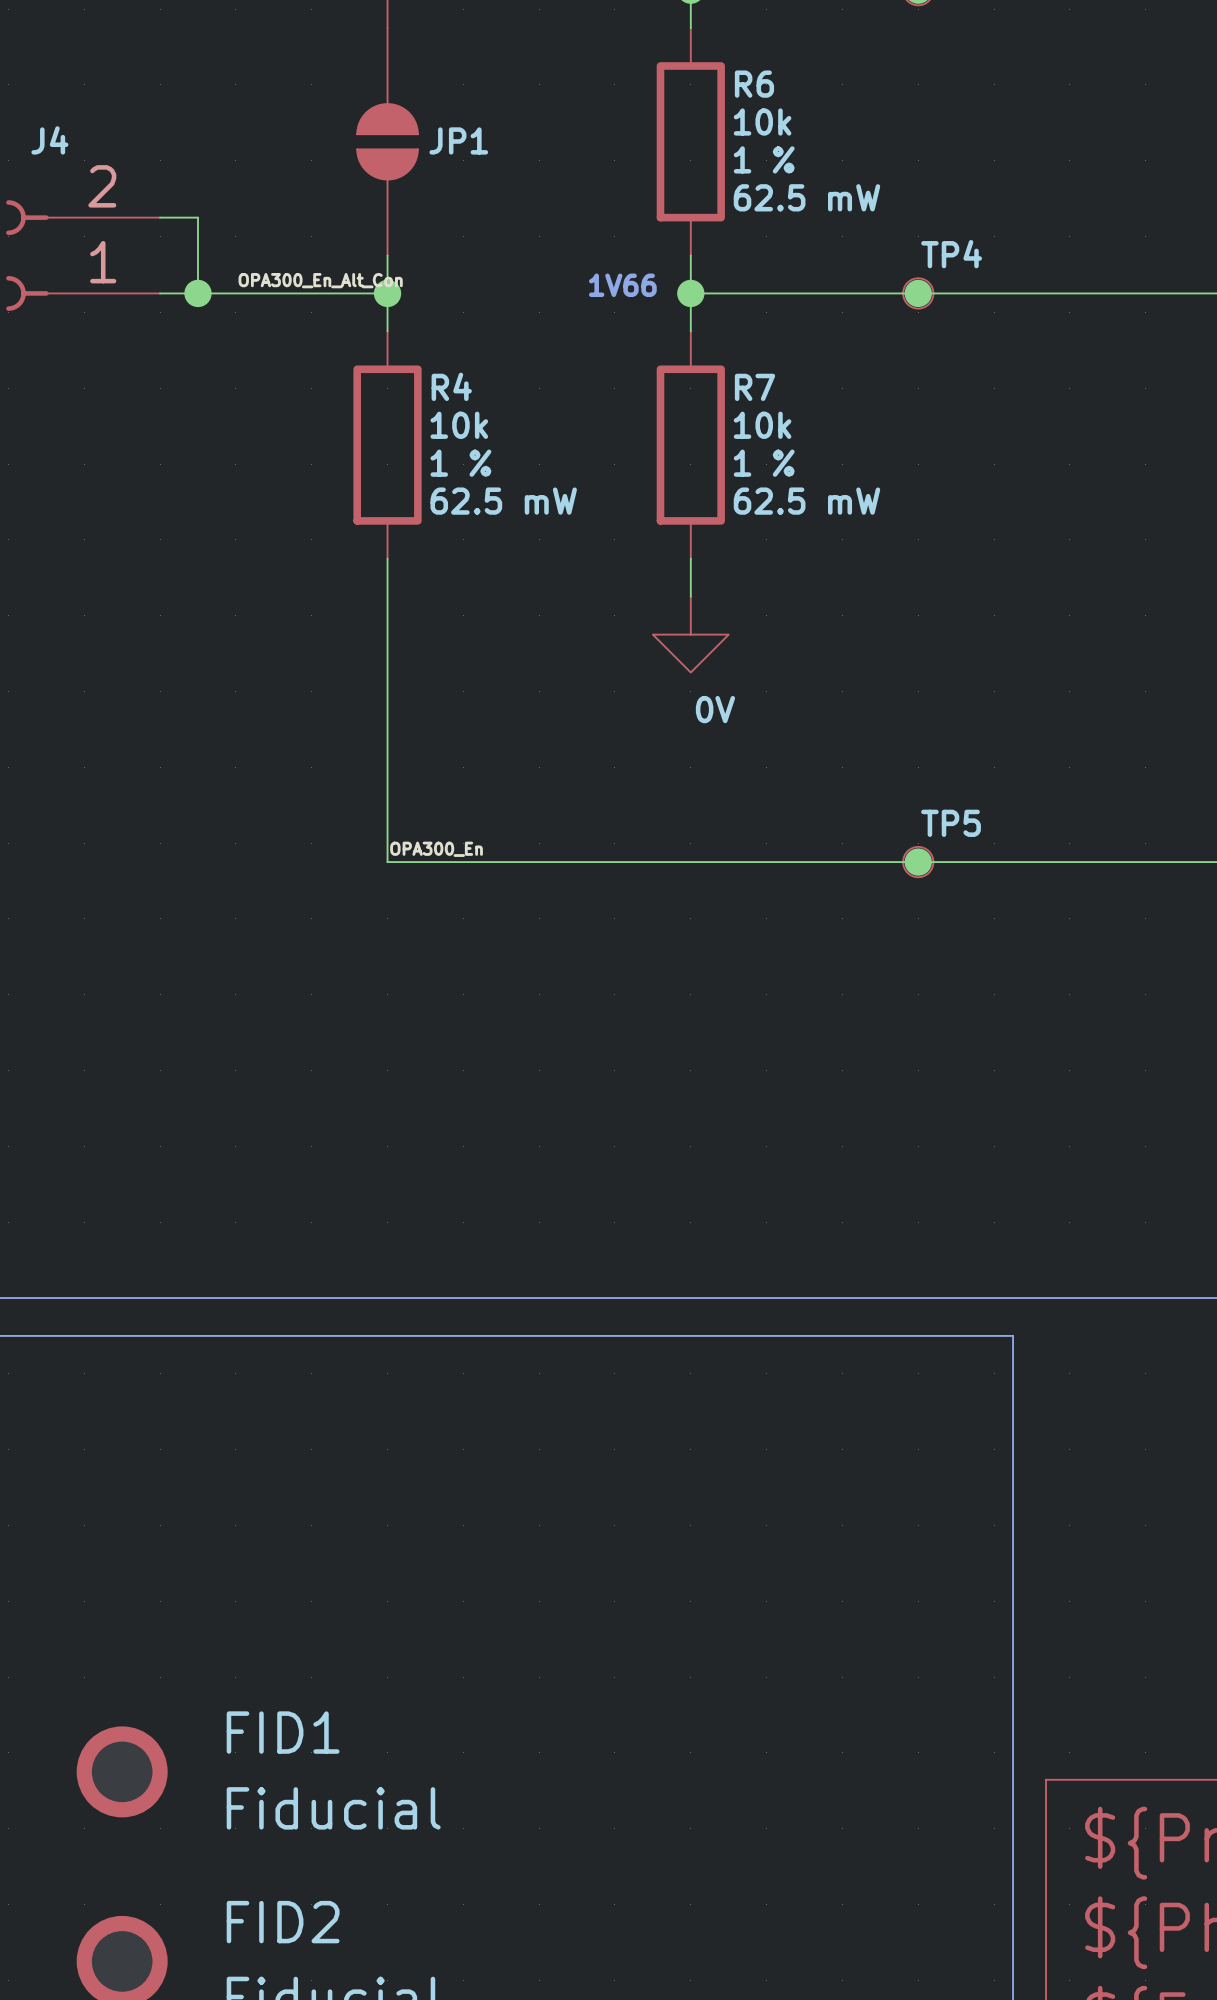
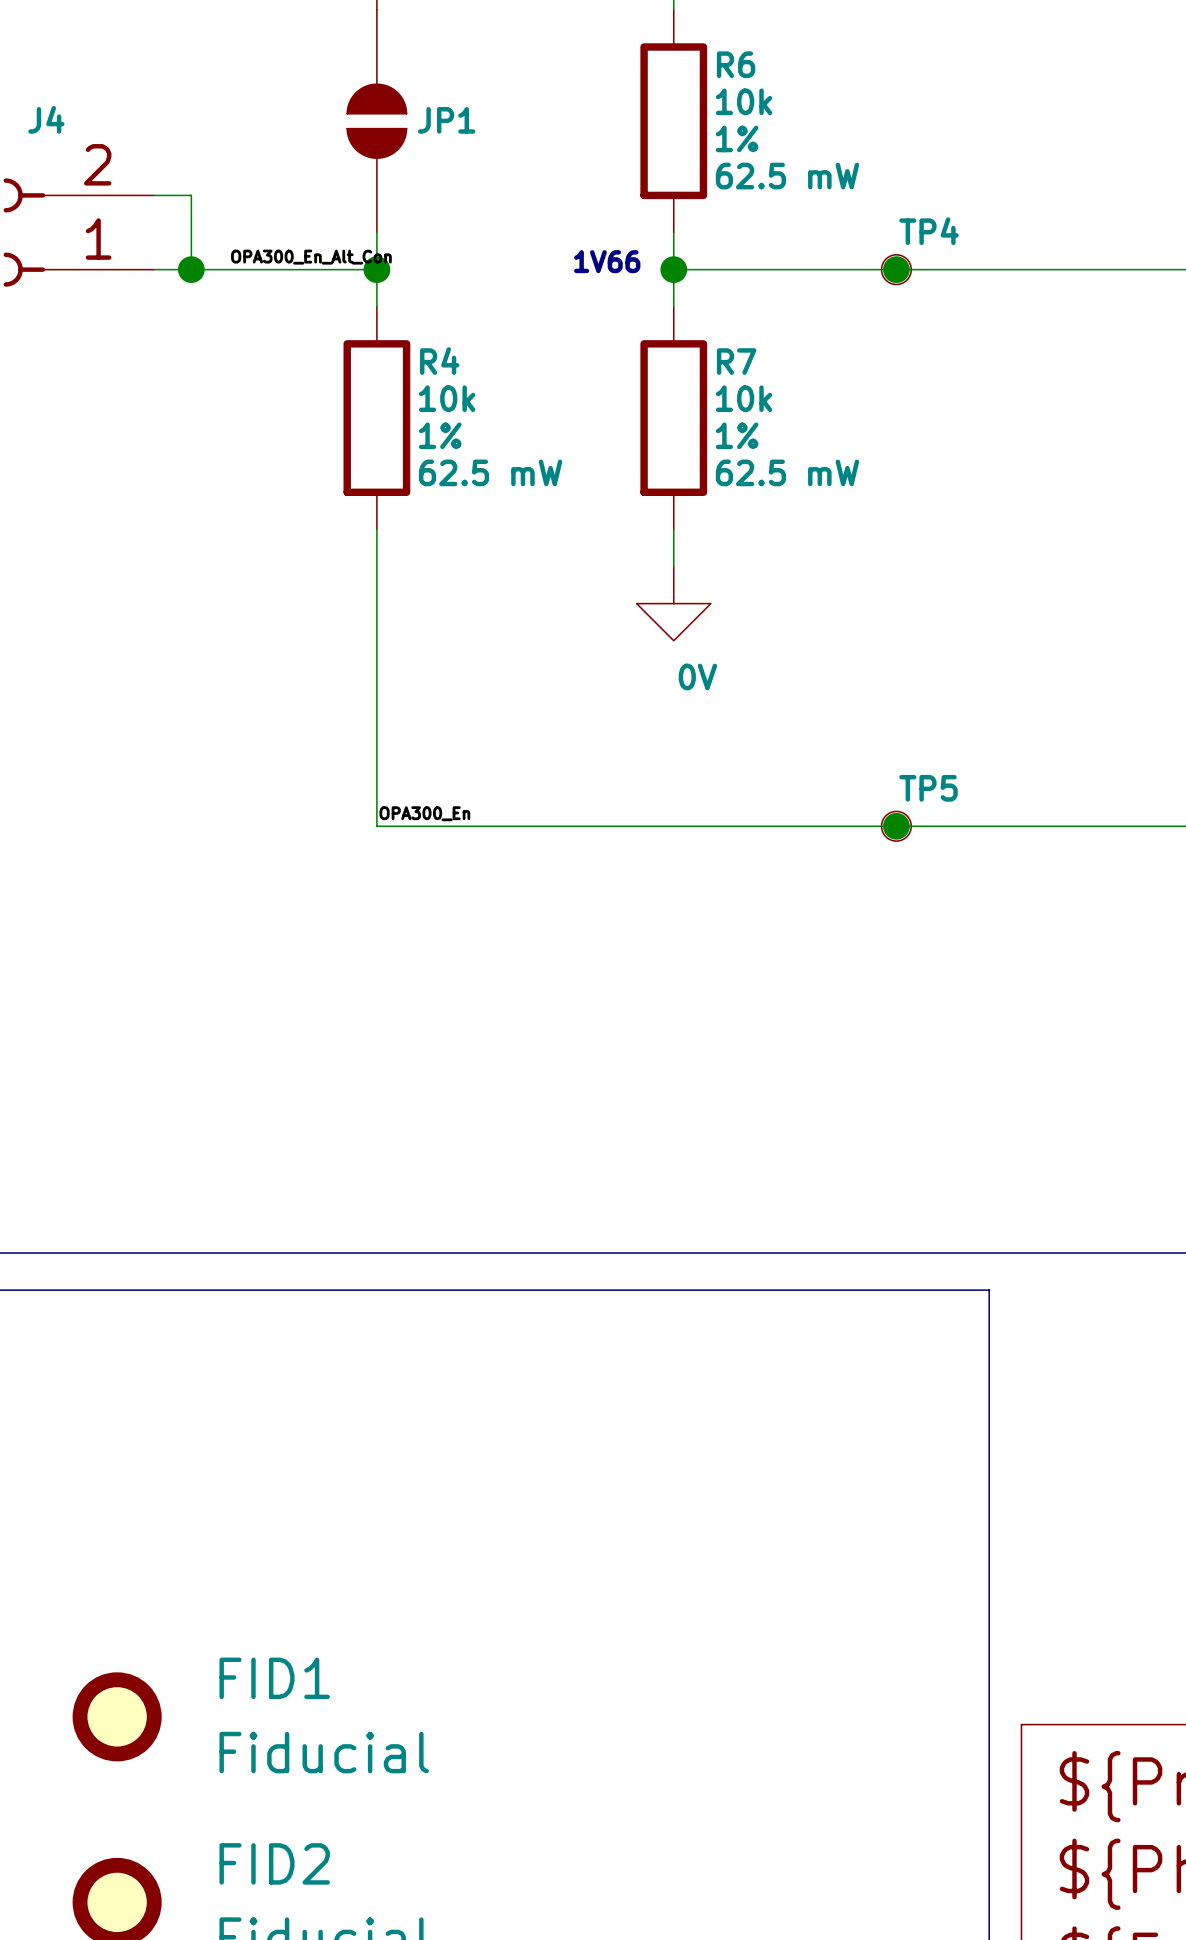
R6 text: 1 % (764, 159) -> 1% (737, 138)
R4 text: 1 % (460, 463) -> 1% (440, 435)
R7 text: 1 % (764, 463) -> 1% (737, 435)

